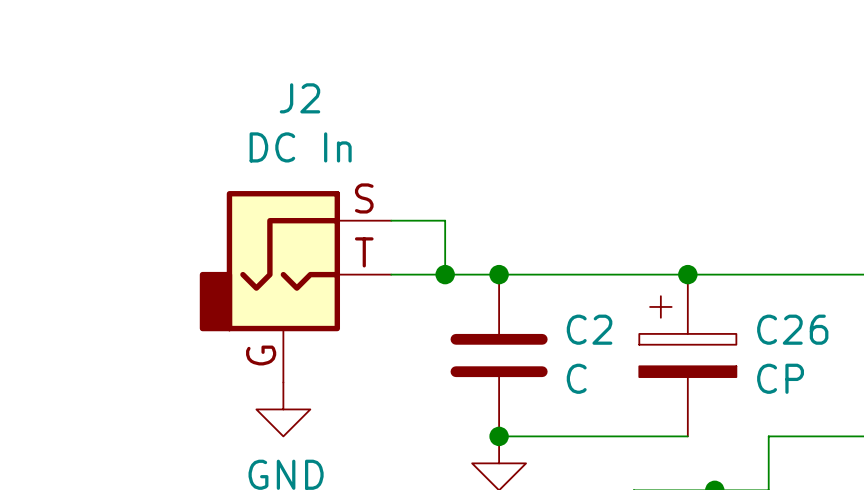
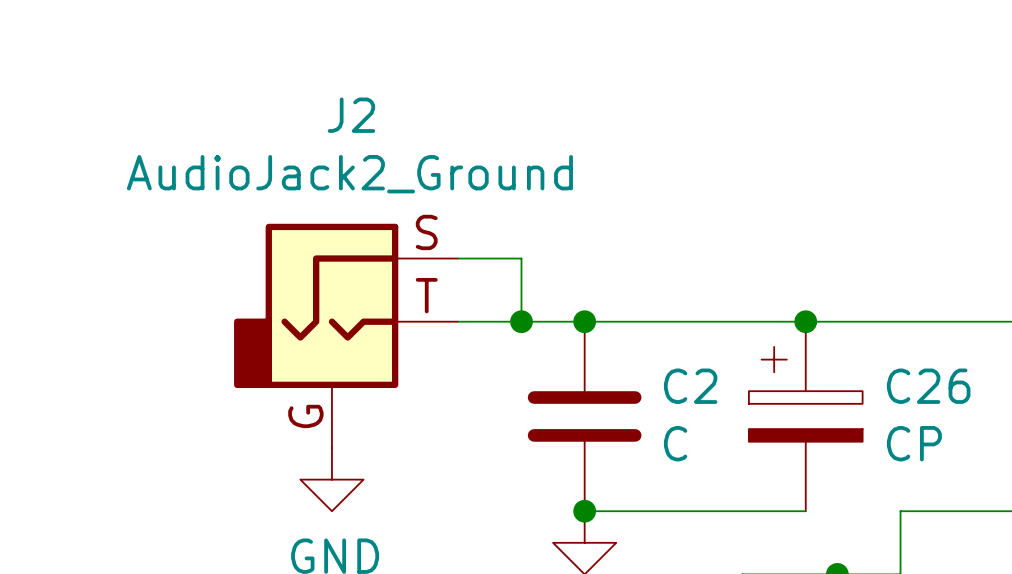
J2 value: DC In (300, 147) -> AudioJack2_Ground (349, 174)

